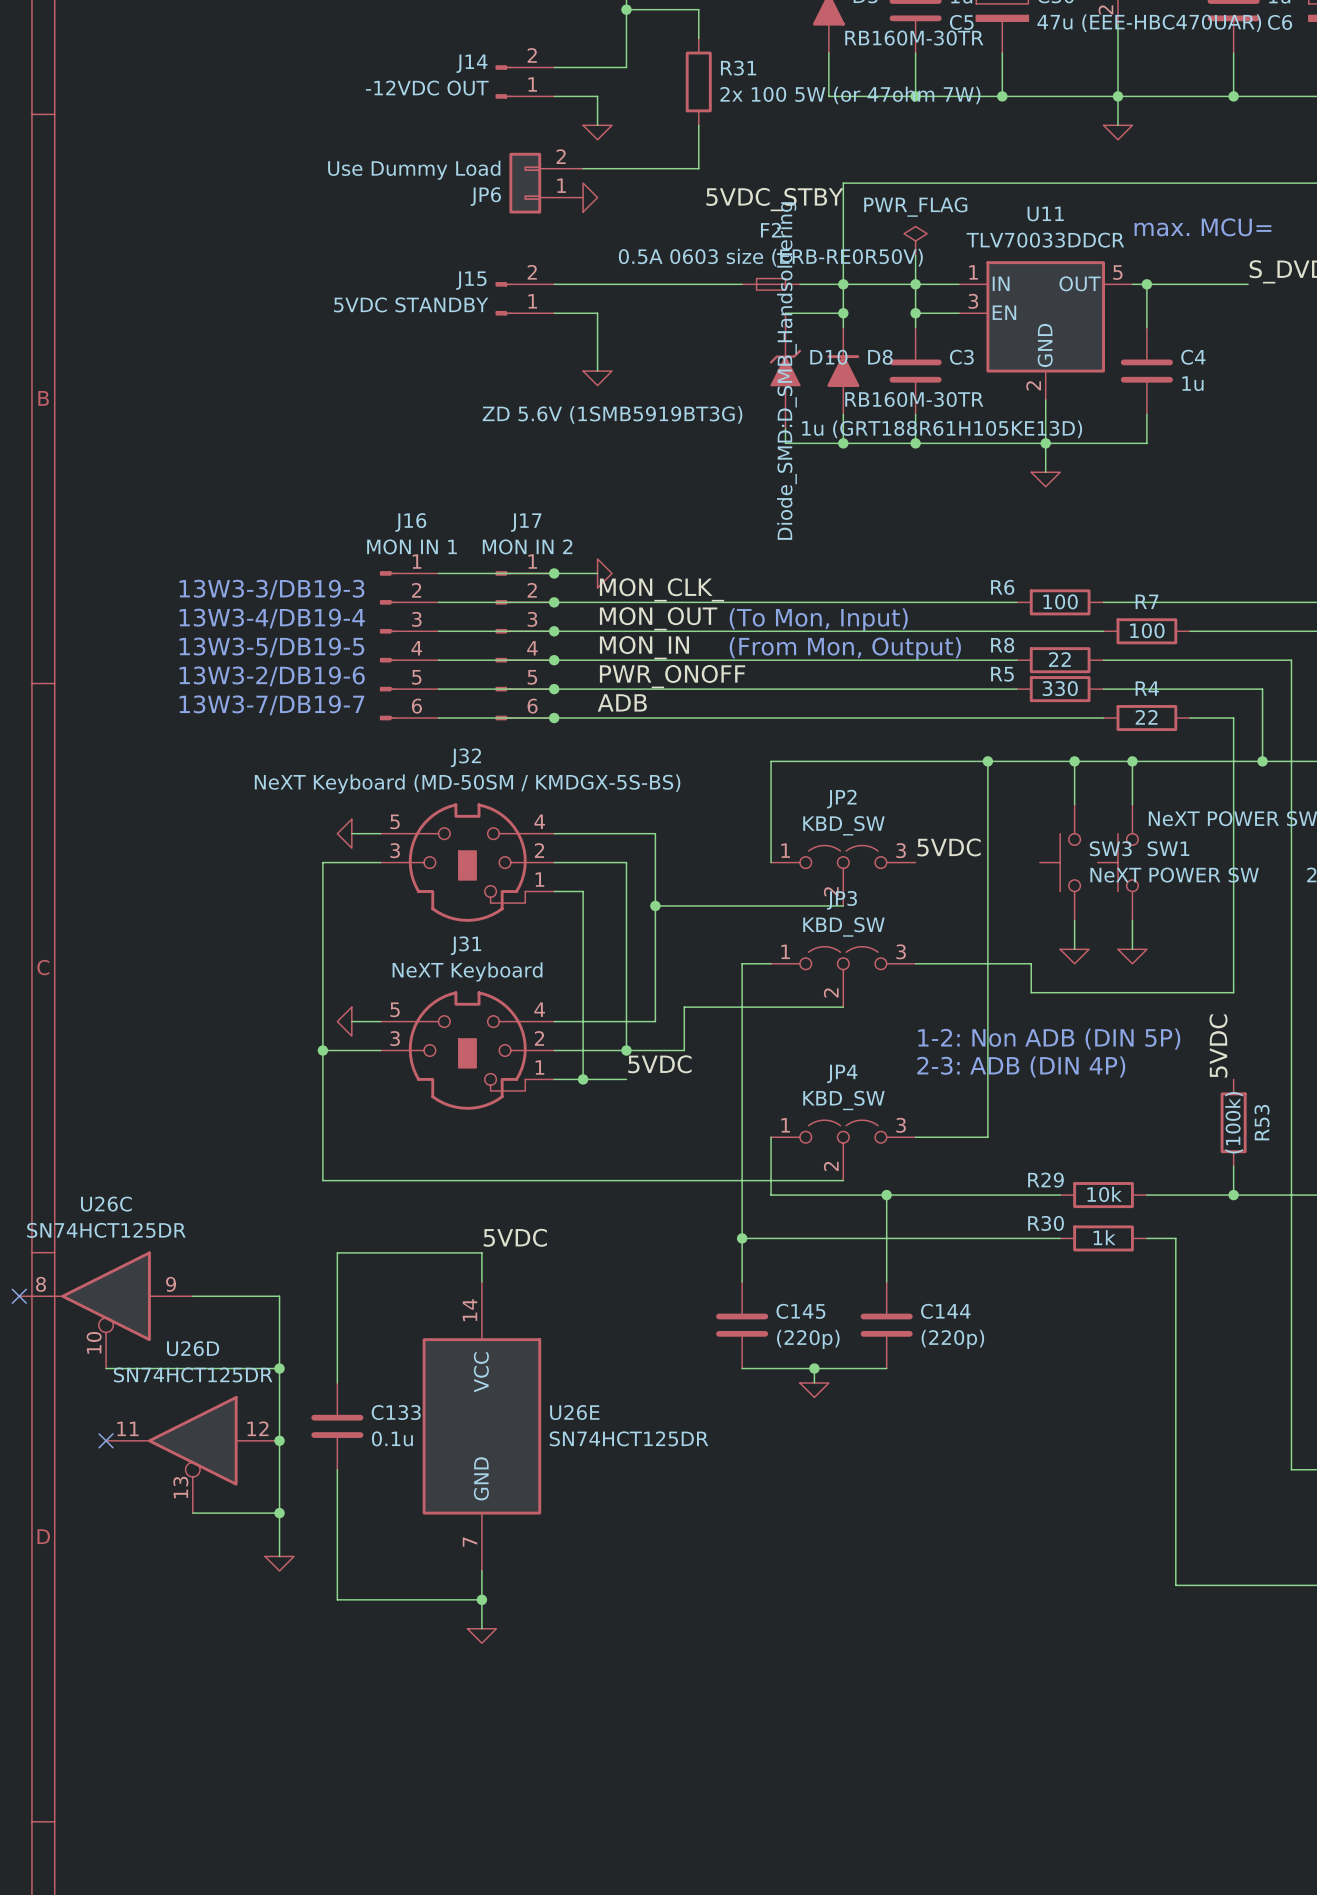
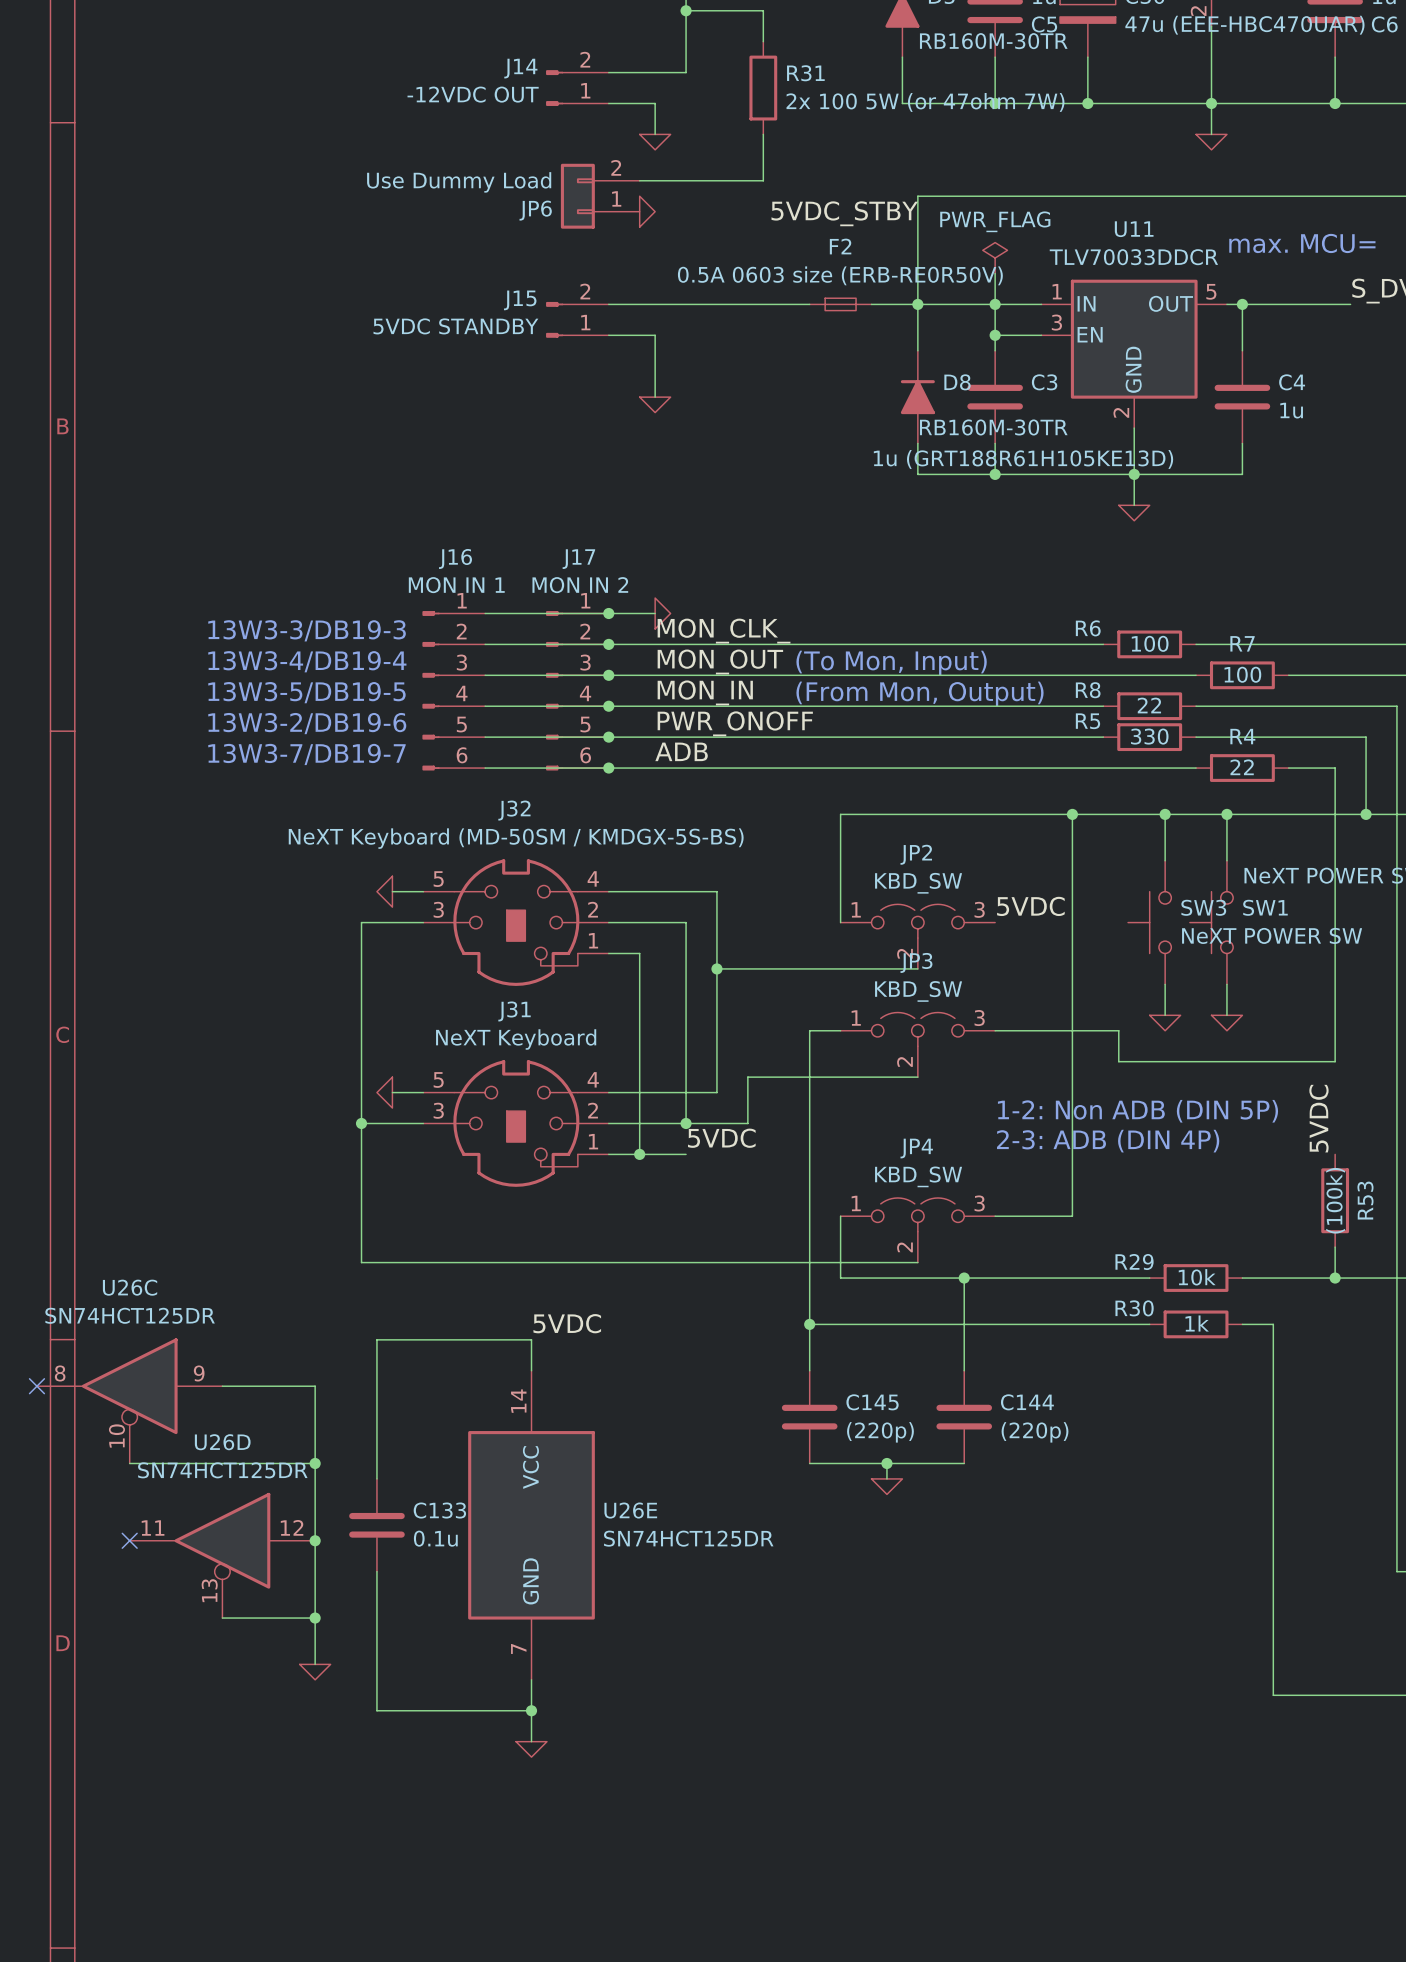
wire: (785, 313) (843, 313) -> none
junction: (843, 313) -> none
D10: ZD 5.6V (1SMB5919BT3G) (785, 371) -> none
wire: (785, 428) (785, 443) (843, 443) -> none
junction: (843, 443) -> none

